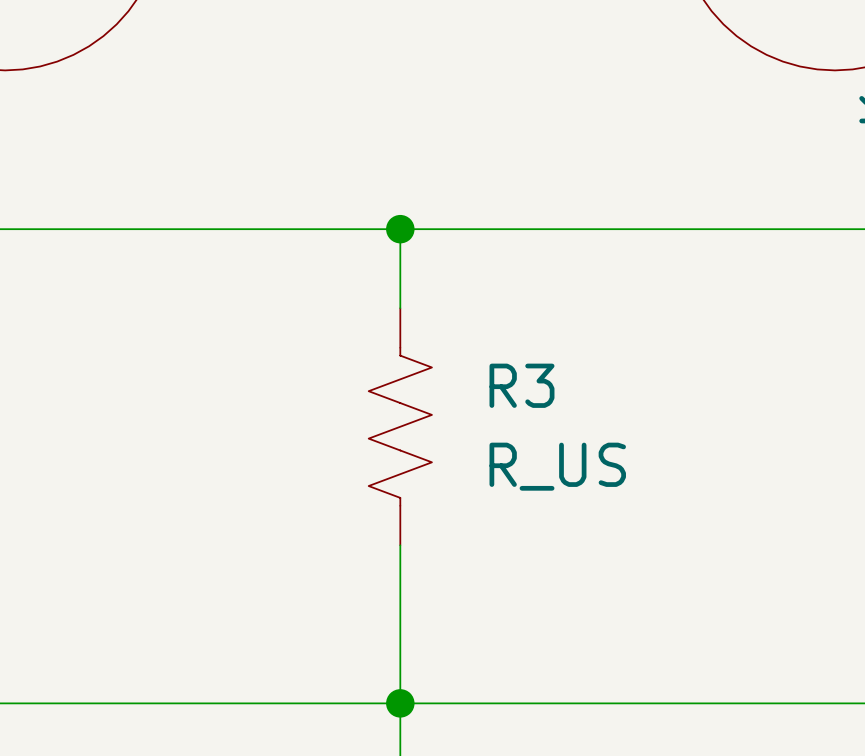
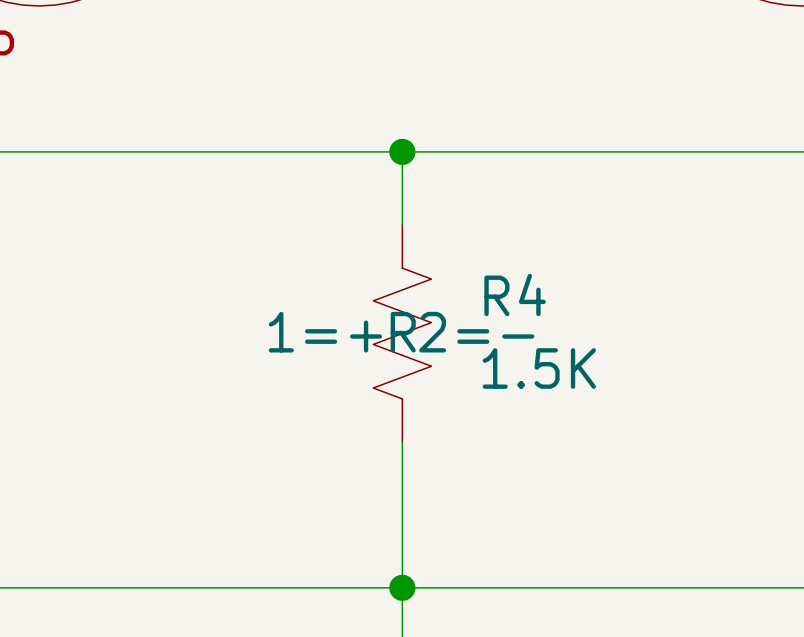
R3 name: R3 (521, 385) -> R4 (515, 294)
R3 text: none -> 1=+ 2=- (401, 332)
R3 text: none -> R (403, 332)
R3 value: R_US (557, 466) -> 1.5K (539, 368)

